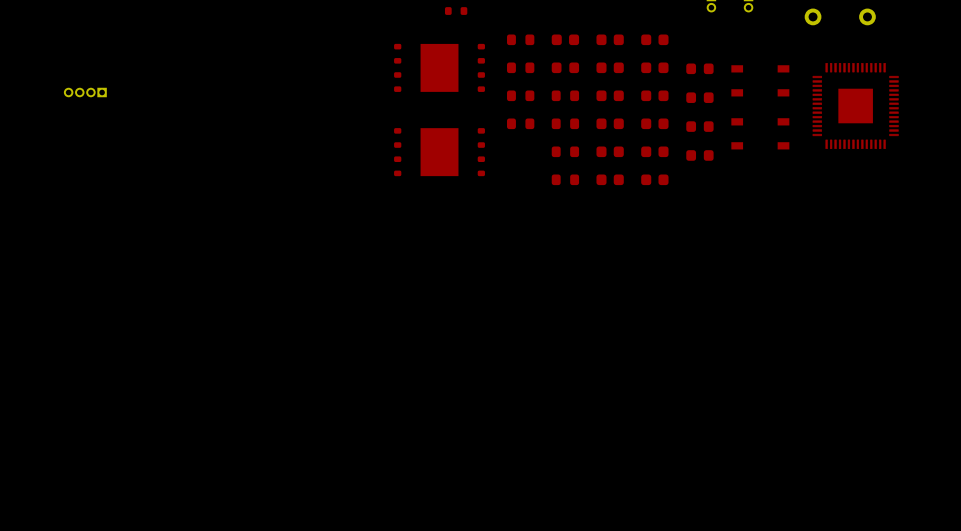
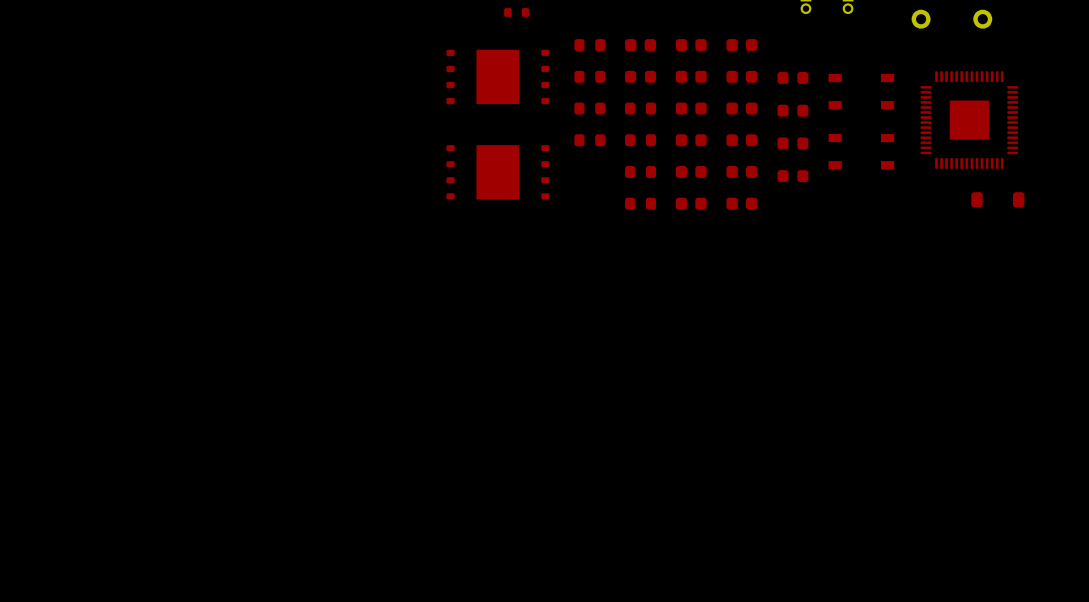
part: (85, 92) -> none
part: none -> (997, 199)

